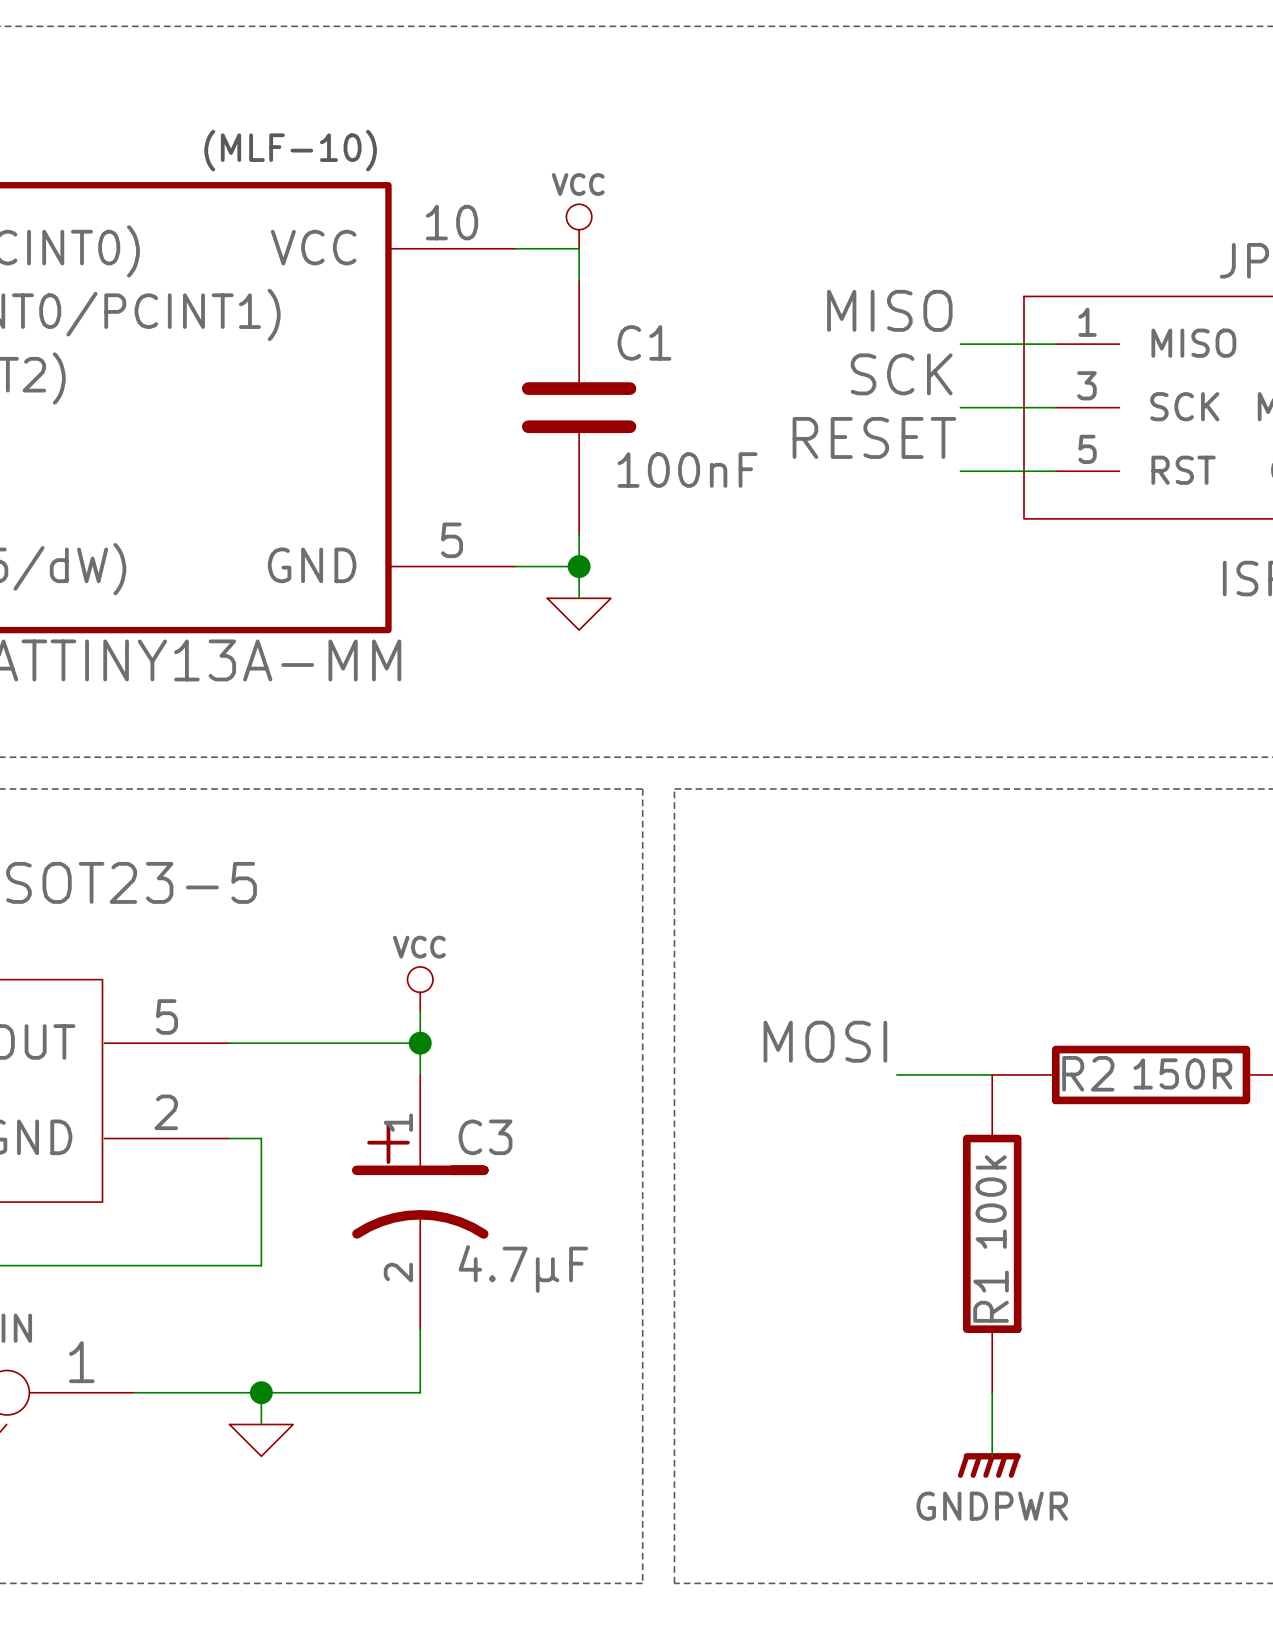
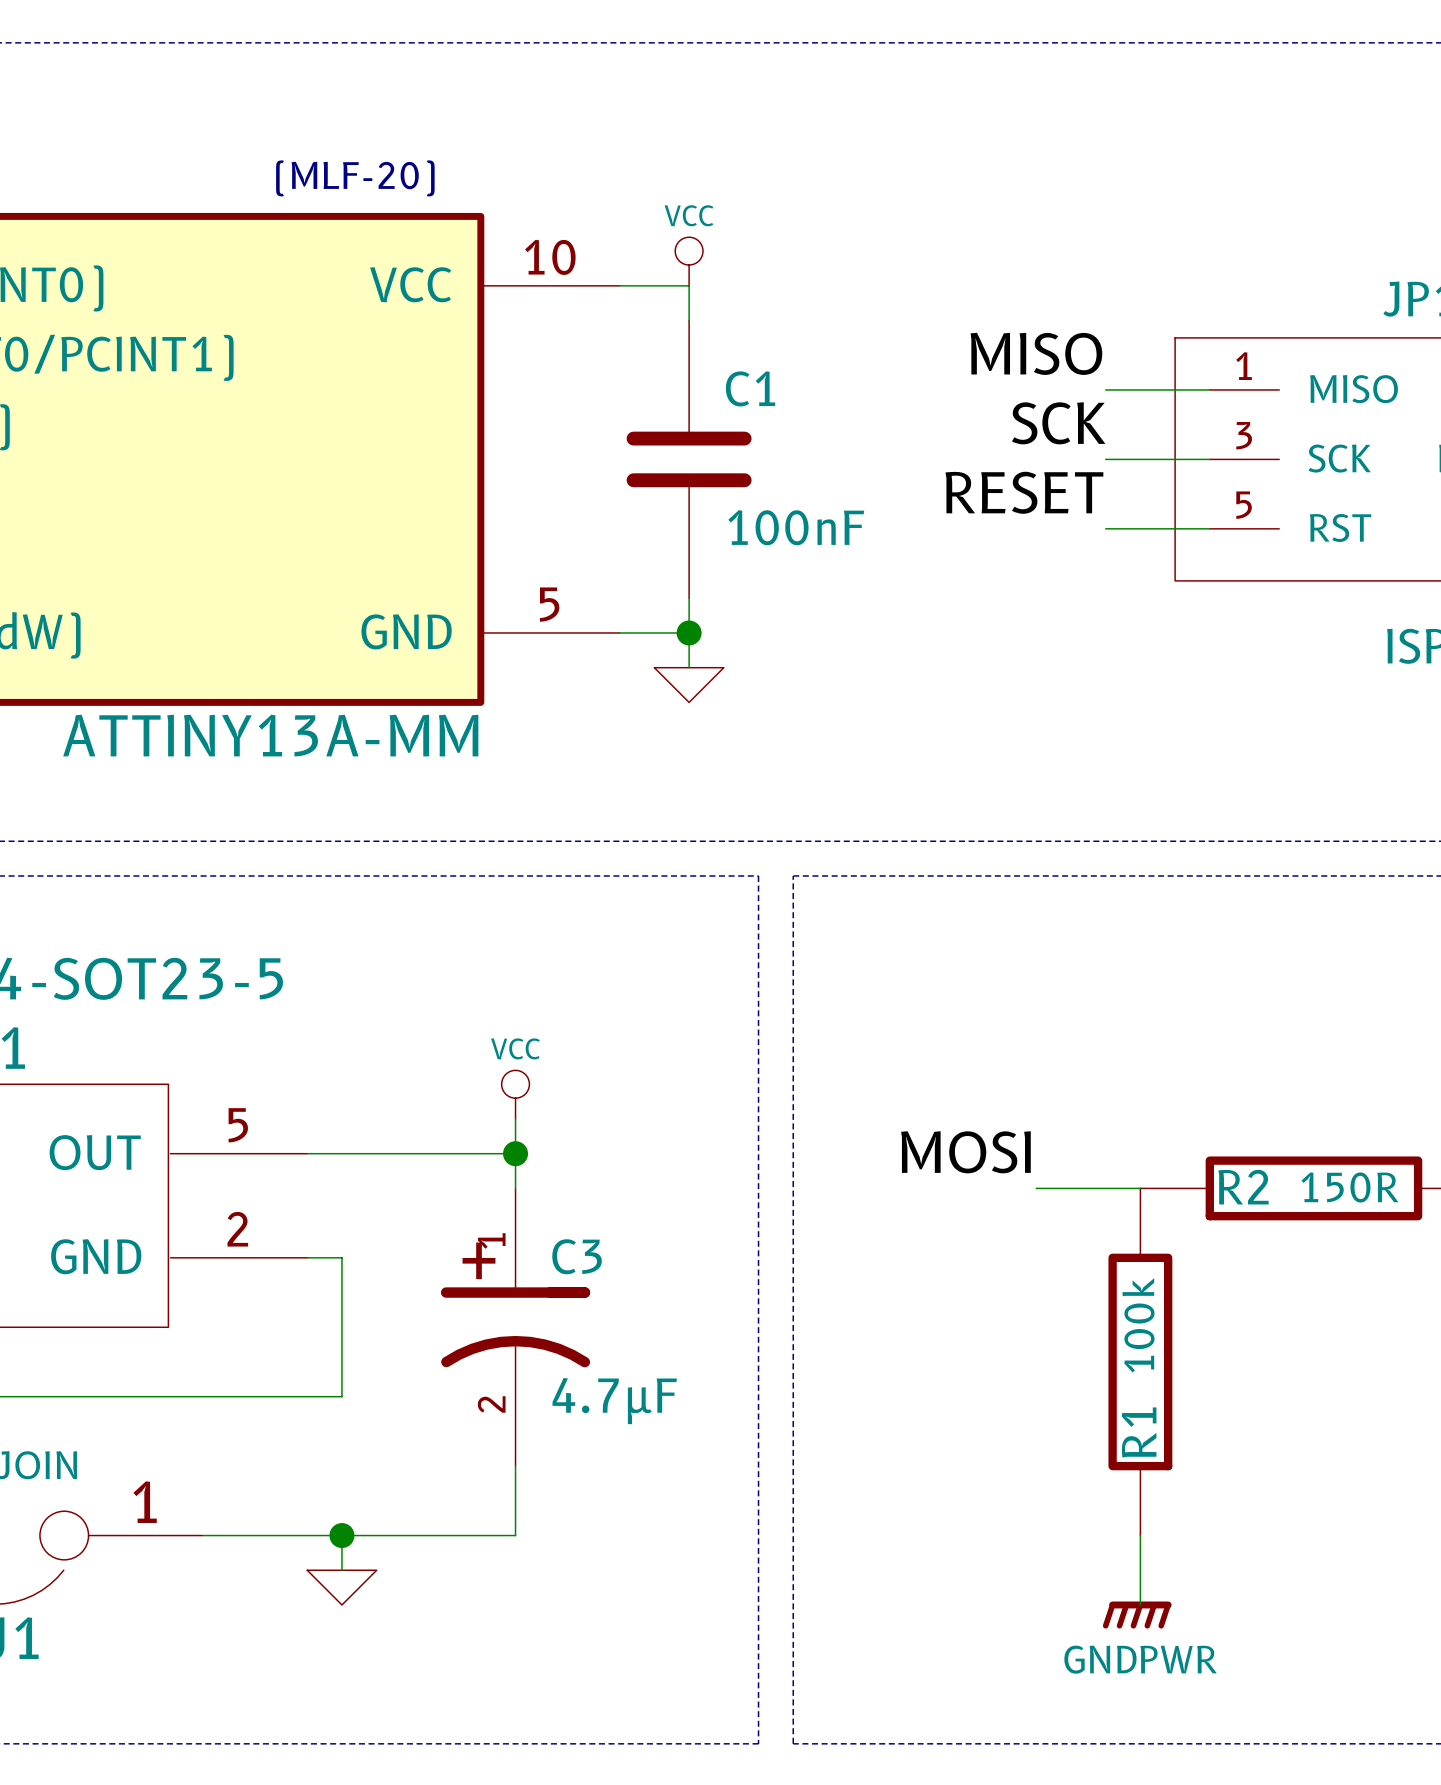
text: (MLF-10) (290, 150) -> (MLF-20) (355, 178)

